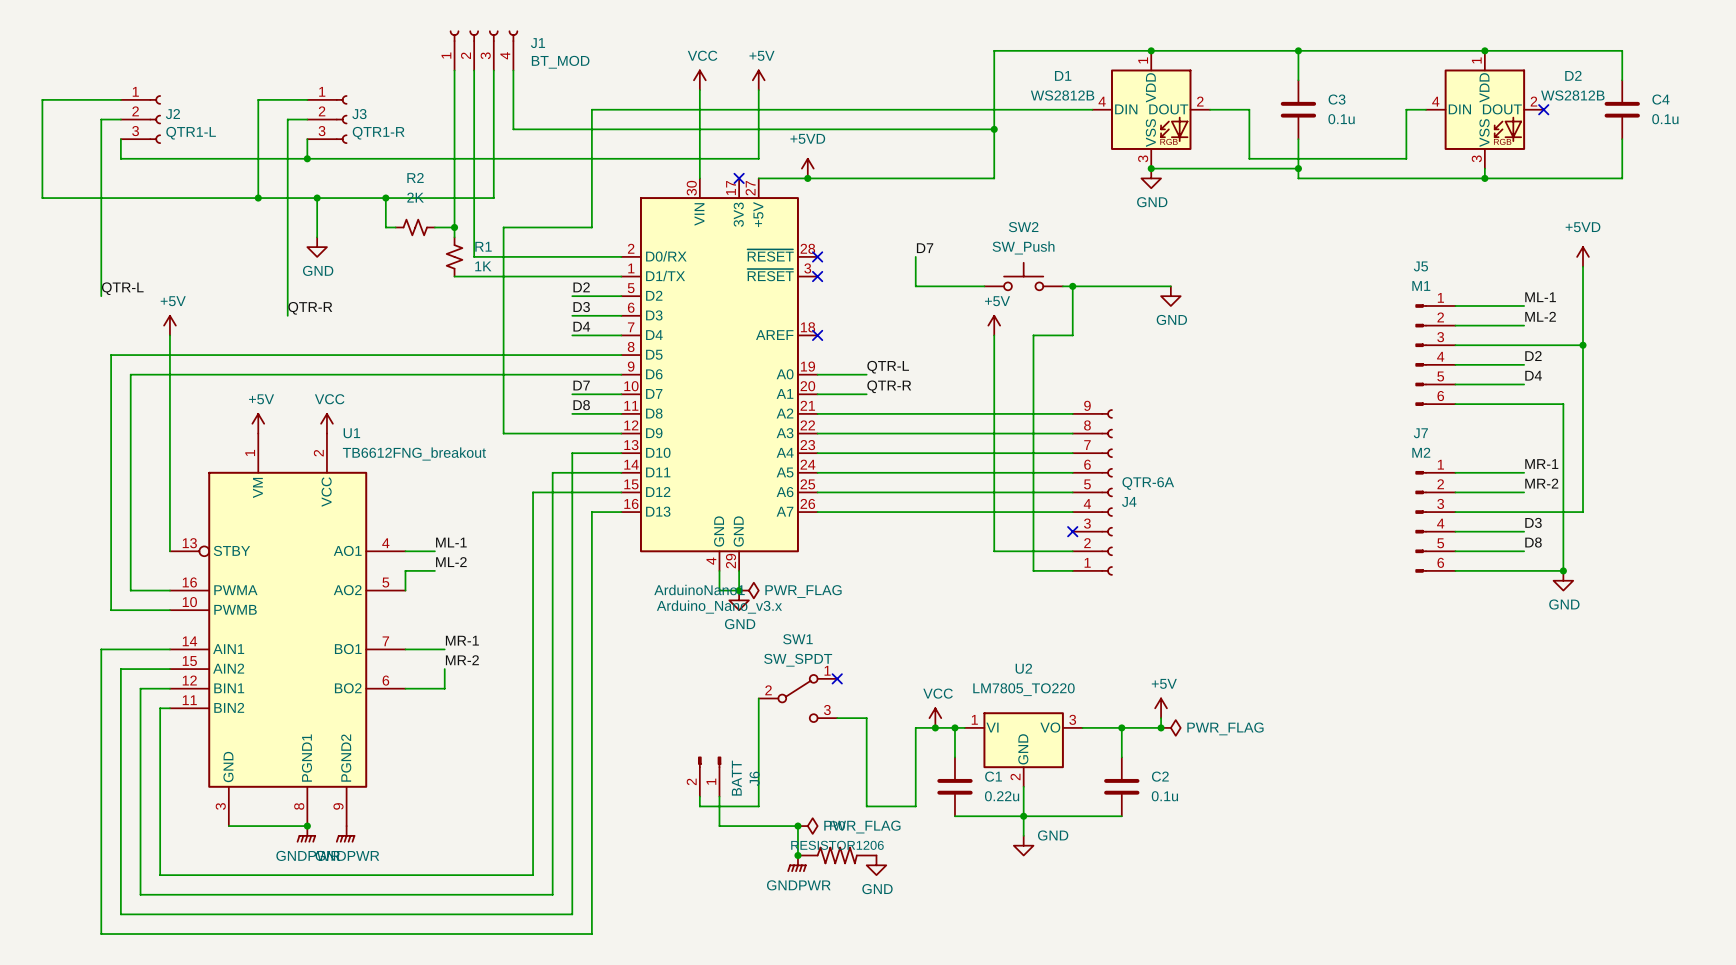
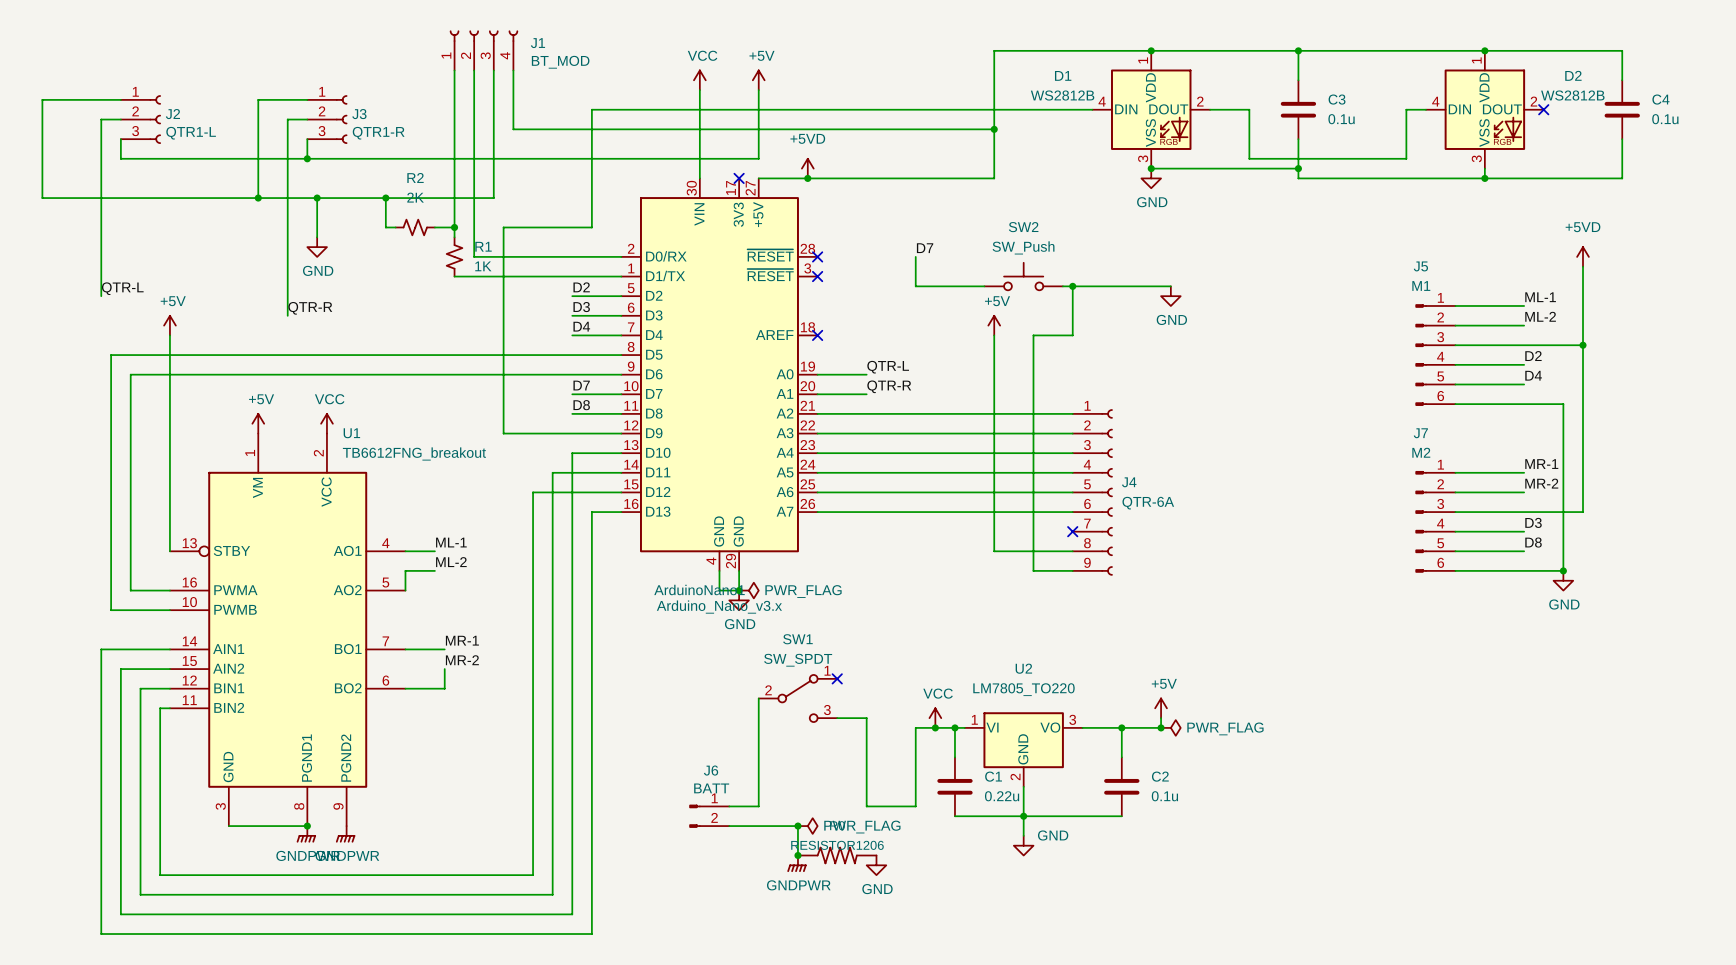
J4 flip: as is (1107, 492) -> up-down (1107, 492)
J6 rotation: 0° (709, 762) -> 90° counterclockwise (694, 816)
J6 position: (709, 776) -> (709, 816)
wire: (719, 796) (719, 826) (729, 826) -> none

